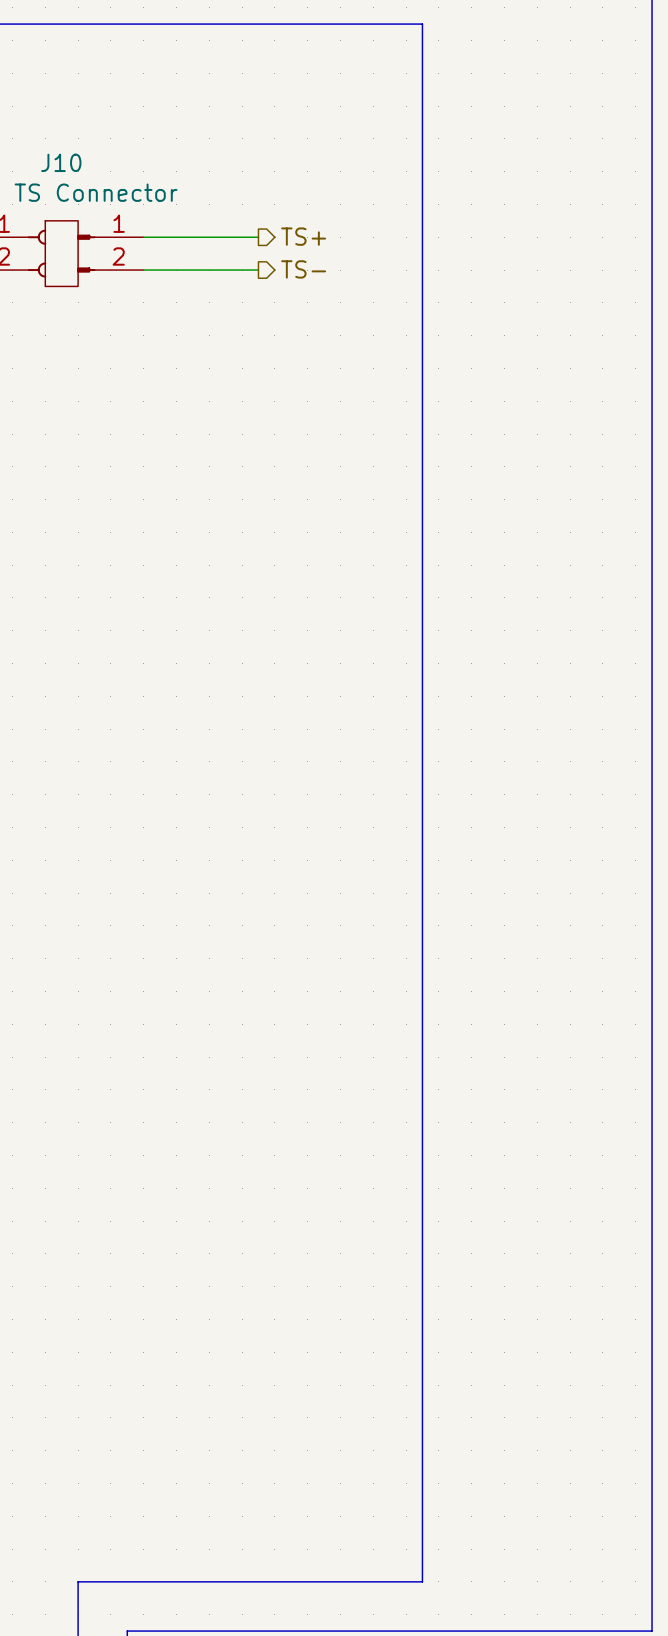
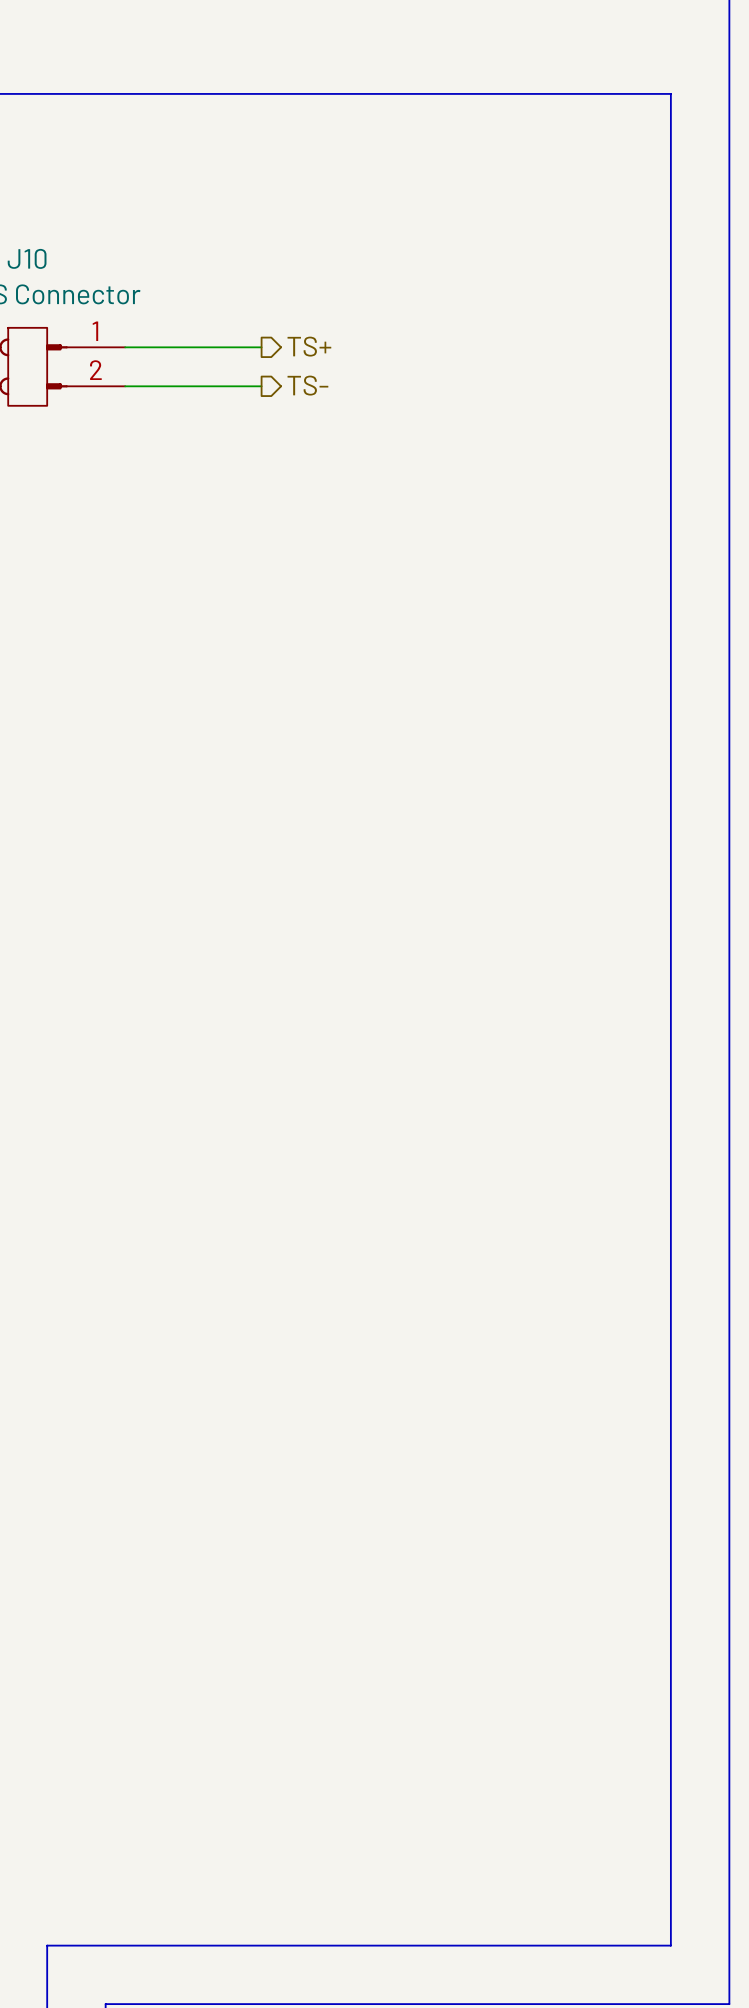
bus: (422, 24) (422, 1581) -> (456, 93) (670, 93) (670, 1945) (456, 1945)

